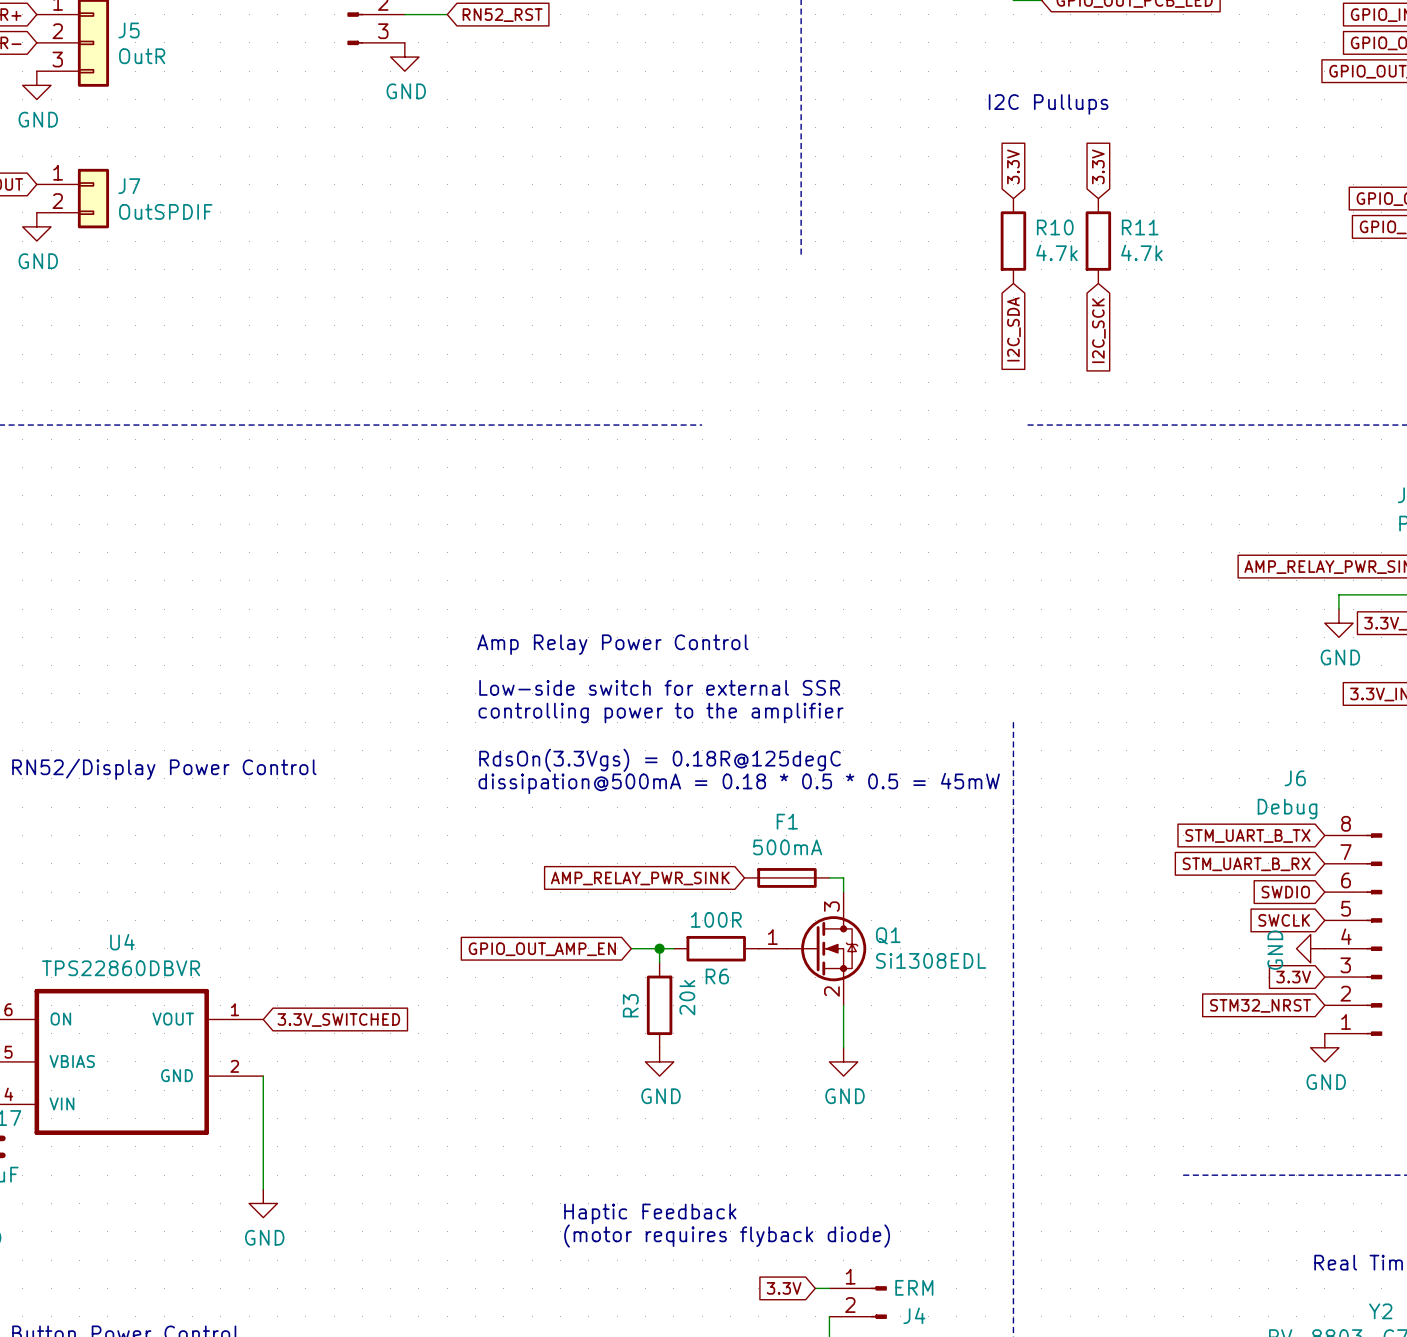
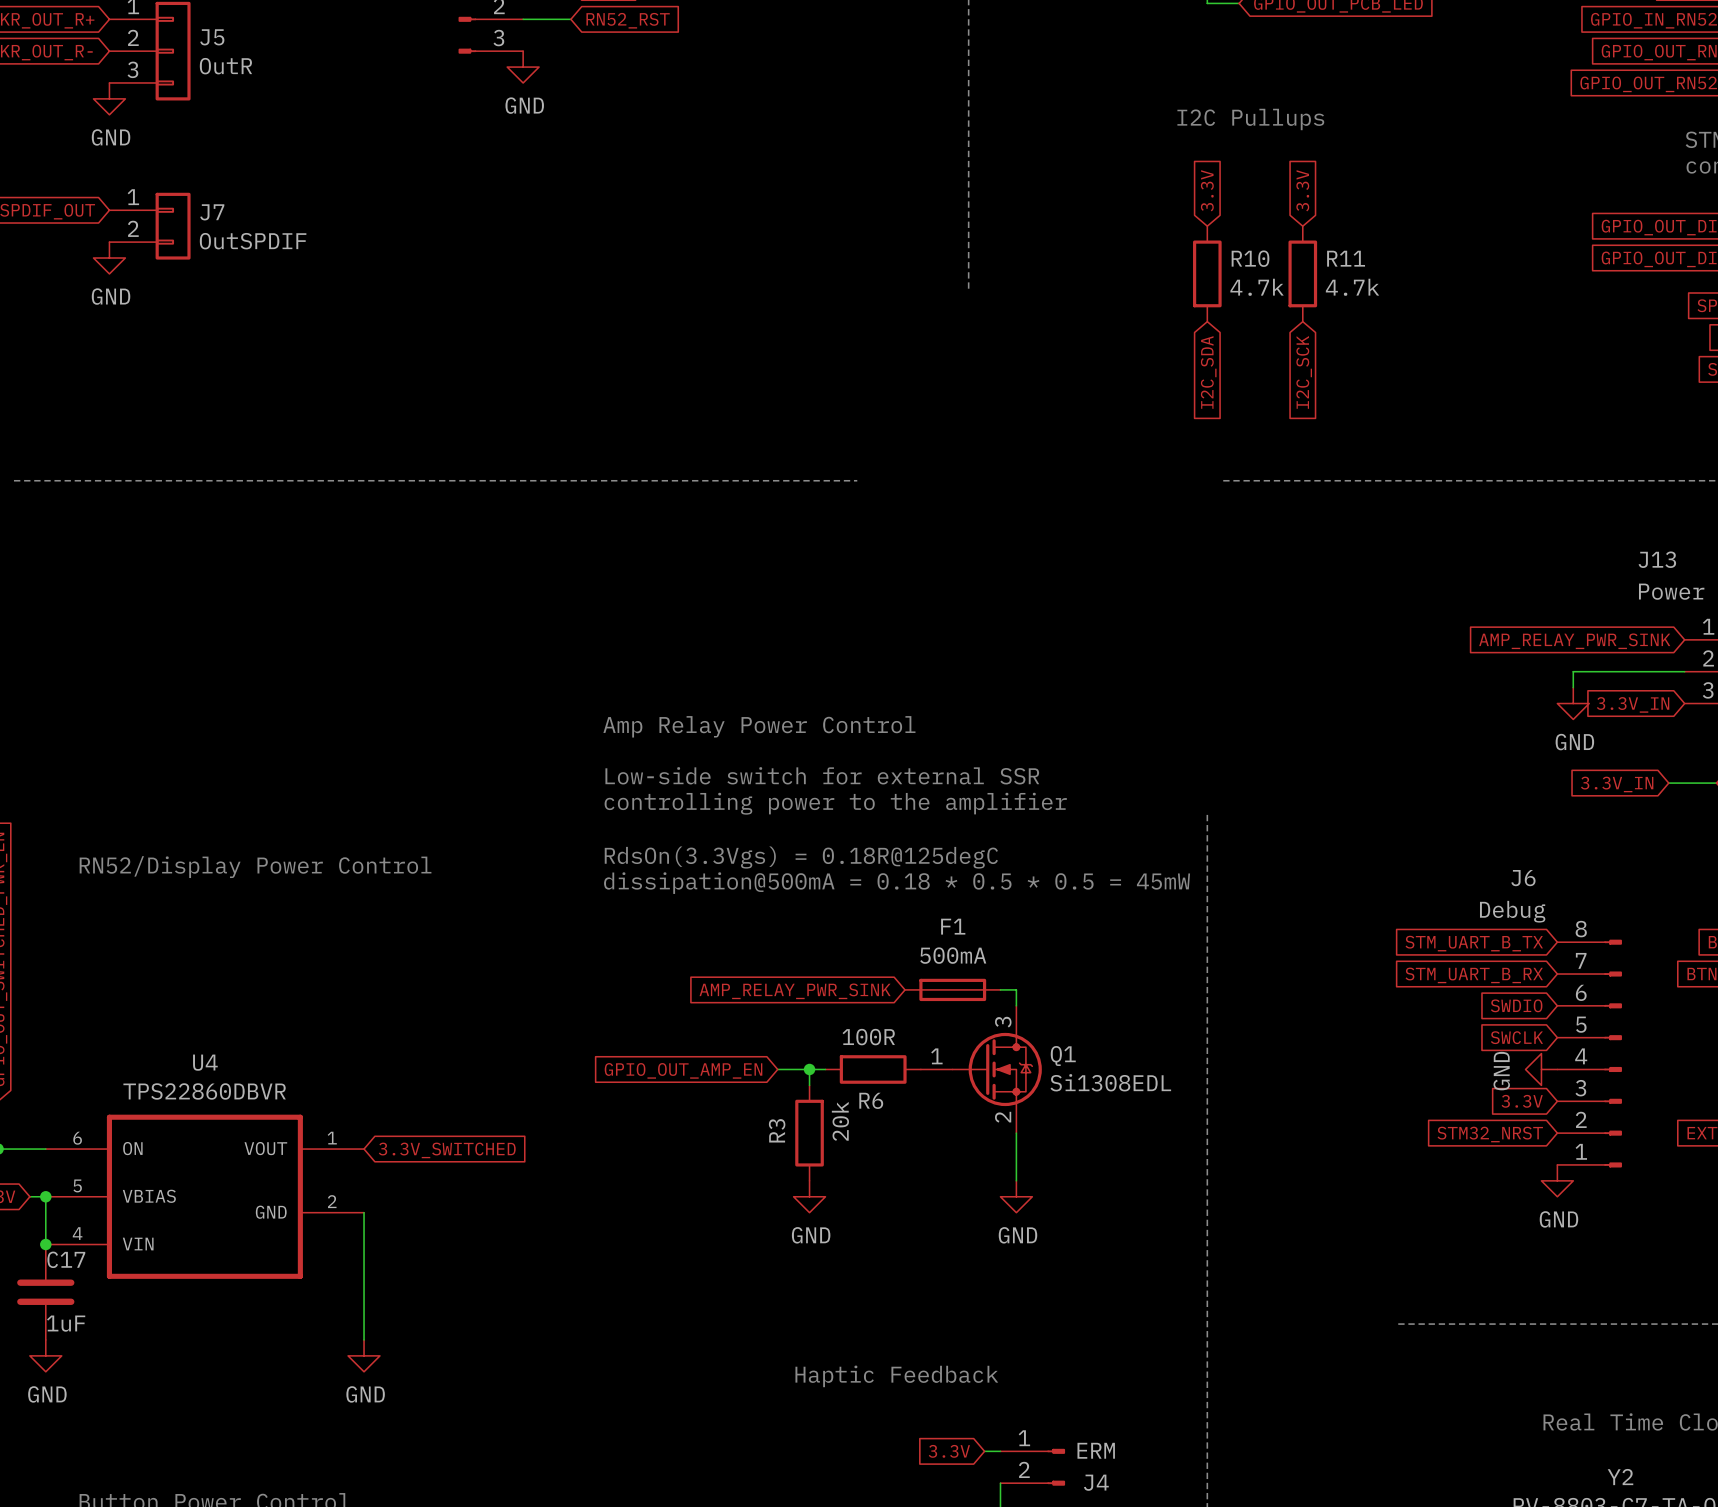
text position: Haptic Feedback (650, 1213) -> Haptic Feedback (896, 1376)
text: (motor requires flyback diode) (727, 1236) -> none

